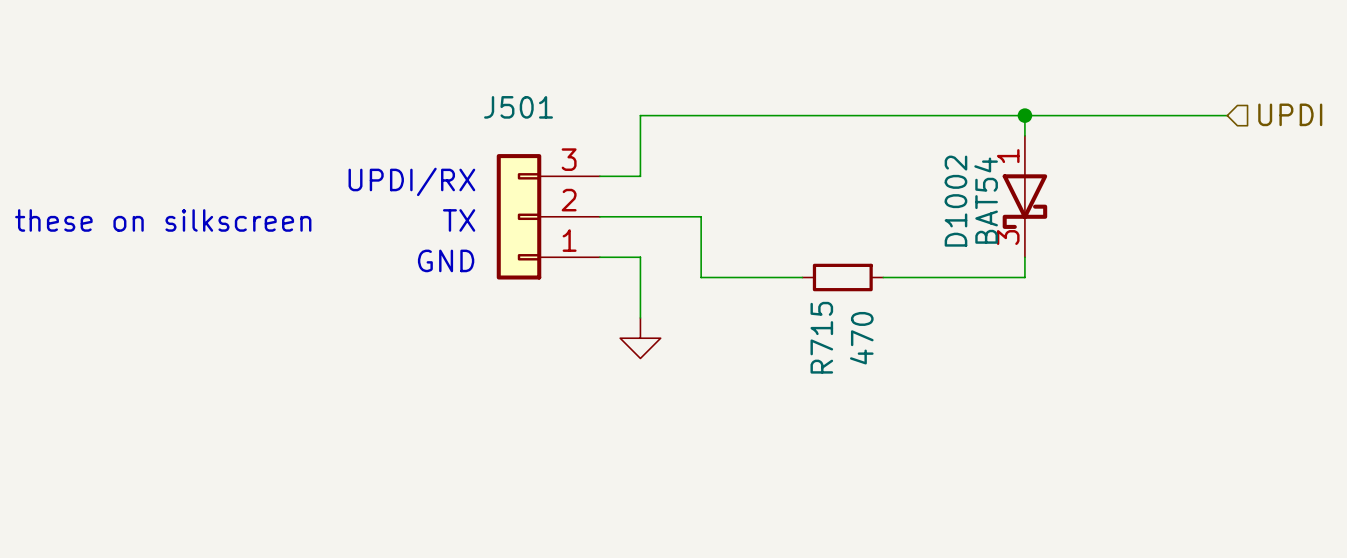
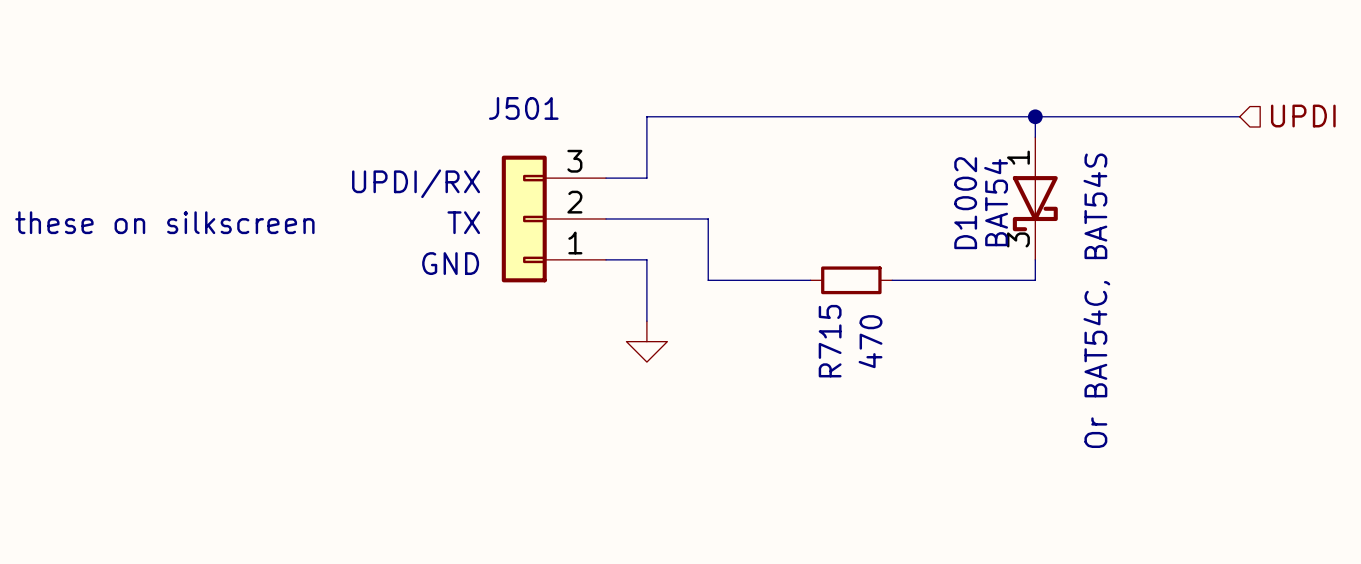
D1002 text: none -> Or BAT54C, BAT54S (1096, 300)

